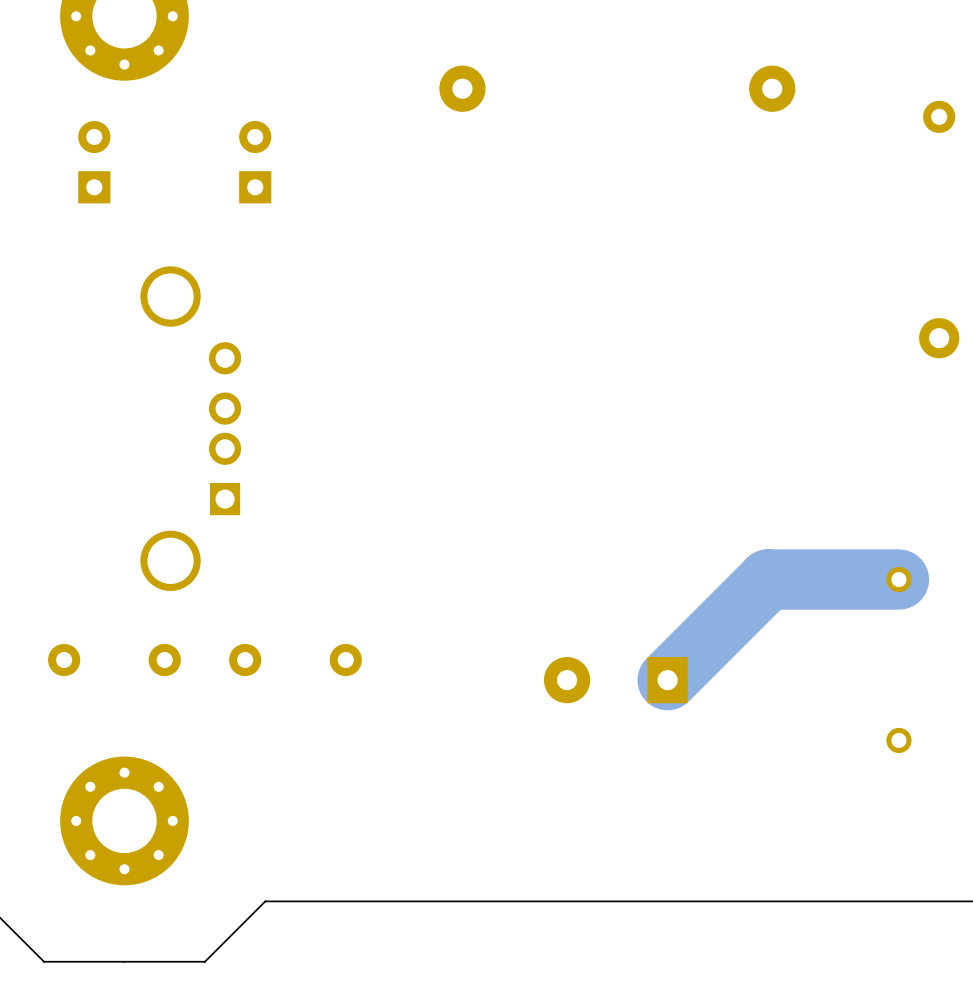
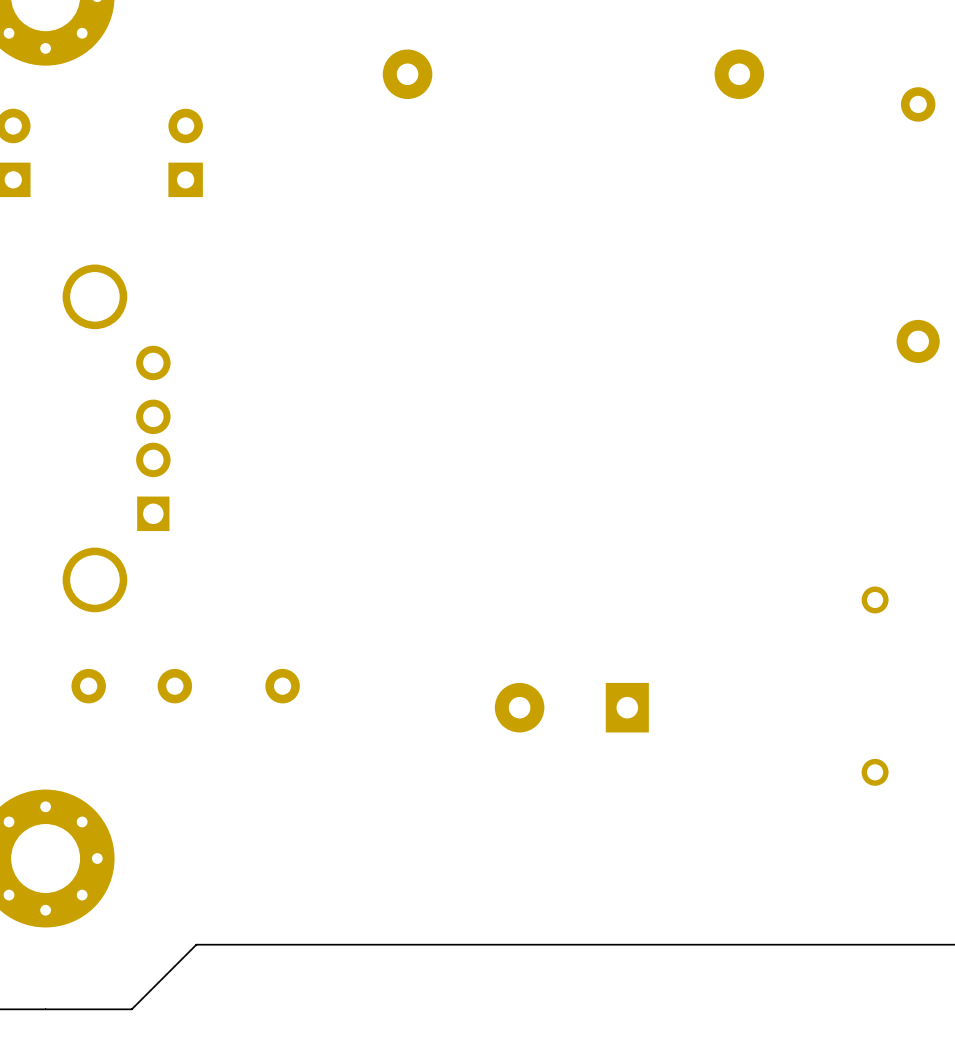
track: (898, 579) (768, 579) (667, 680) -> none

